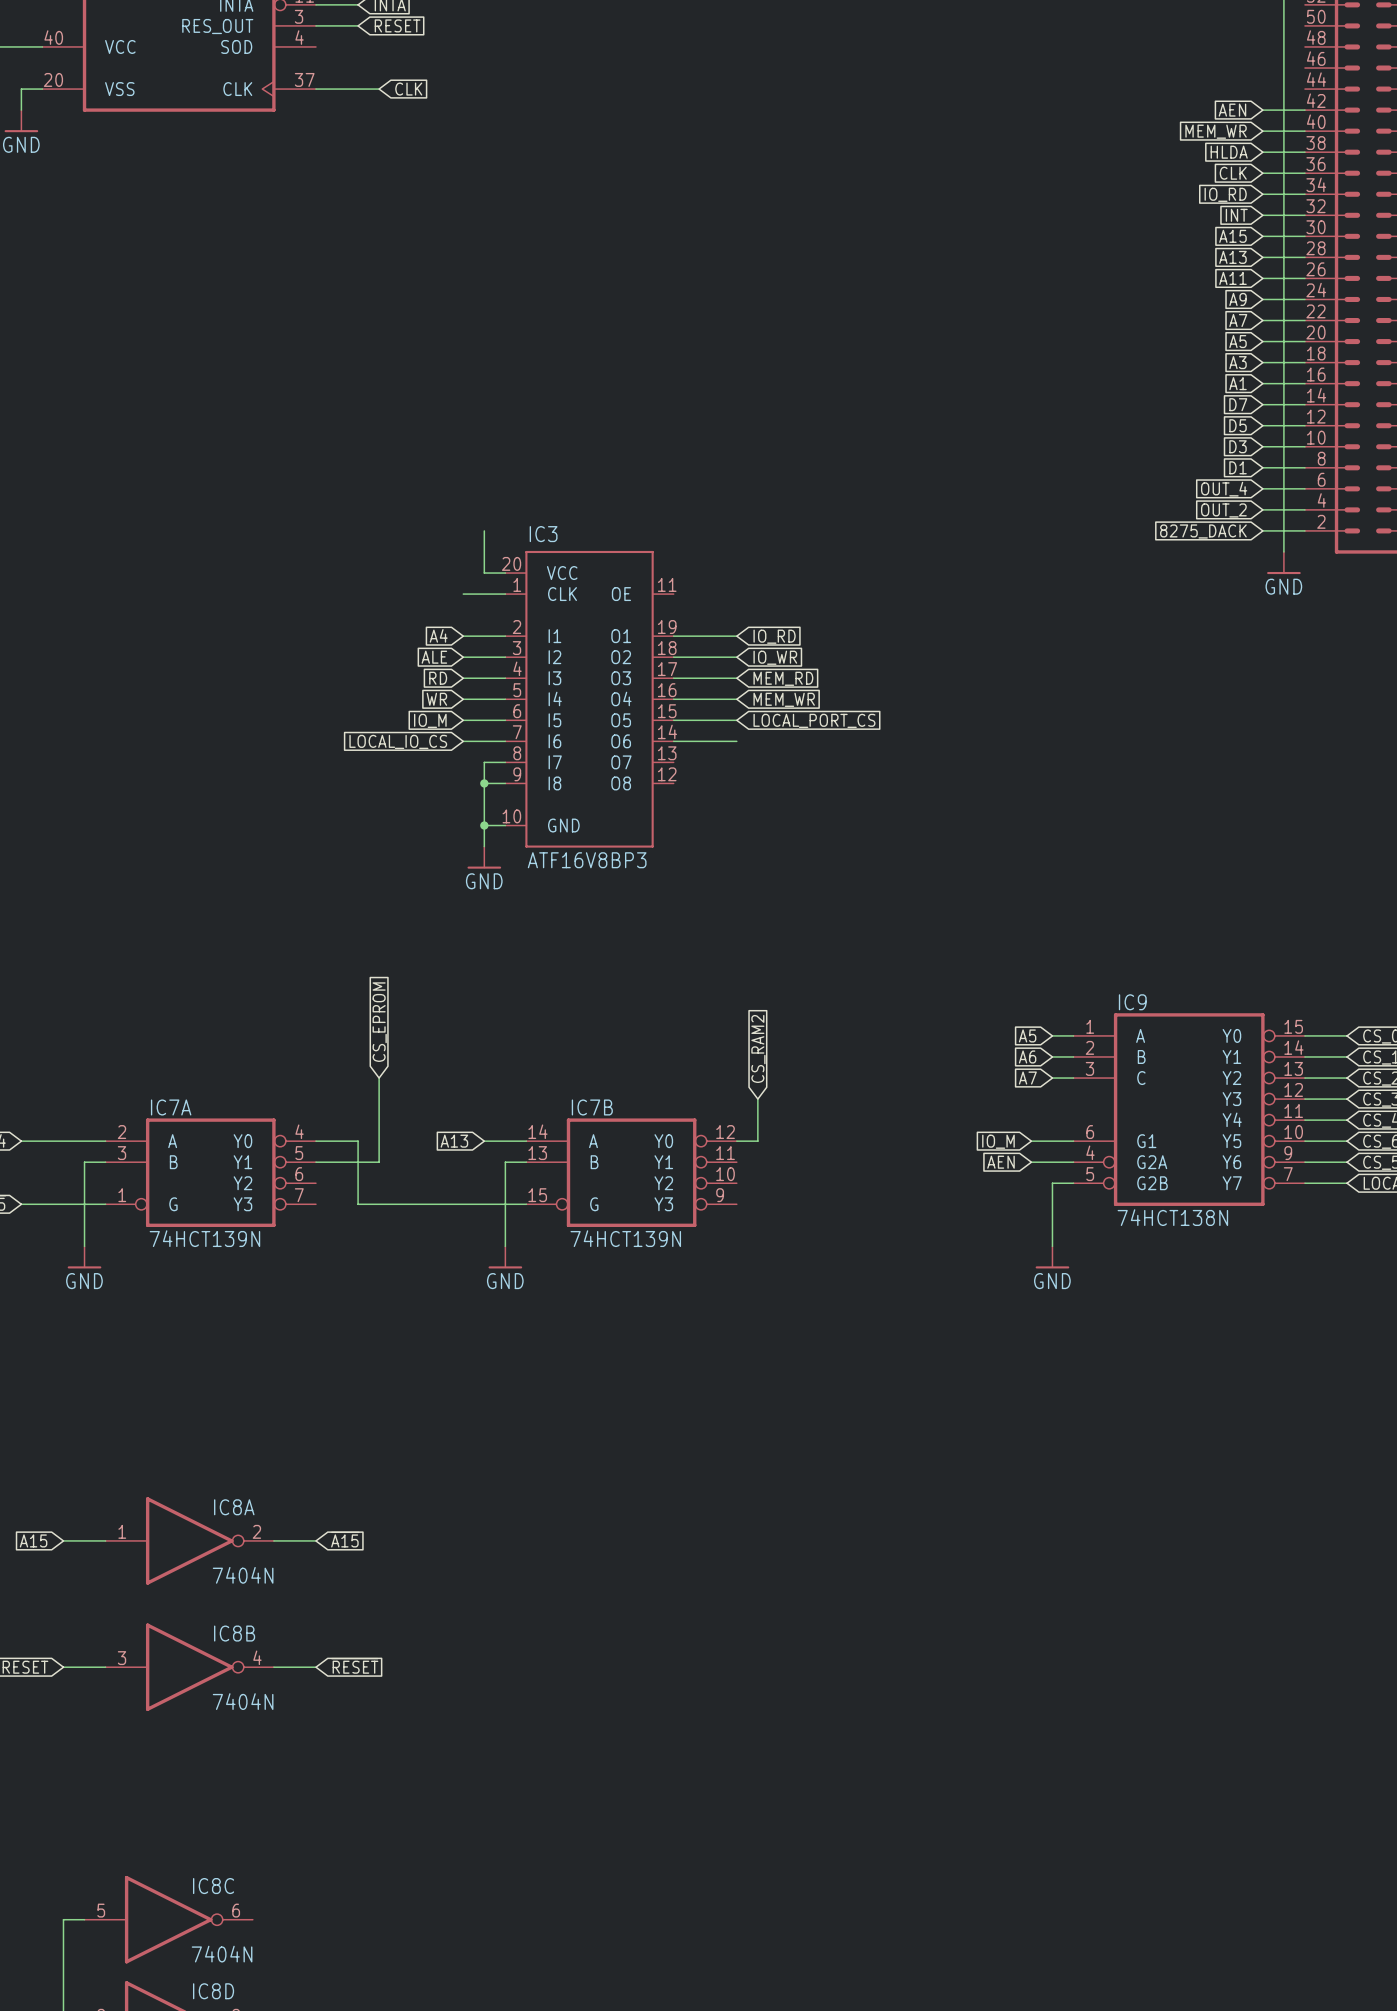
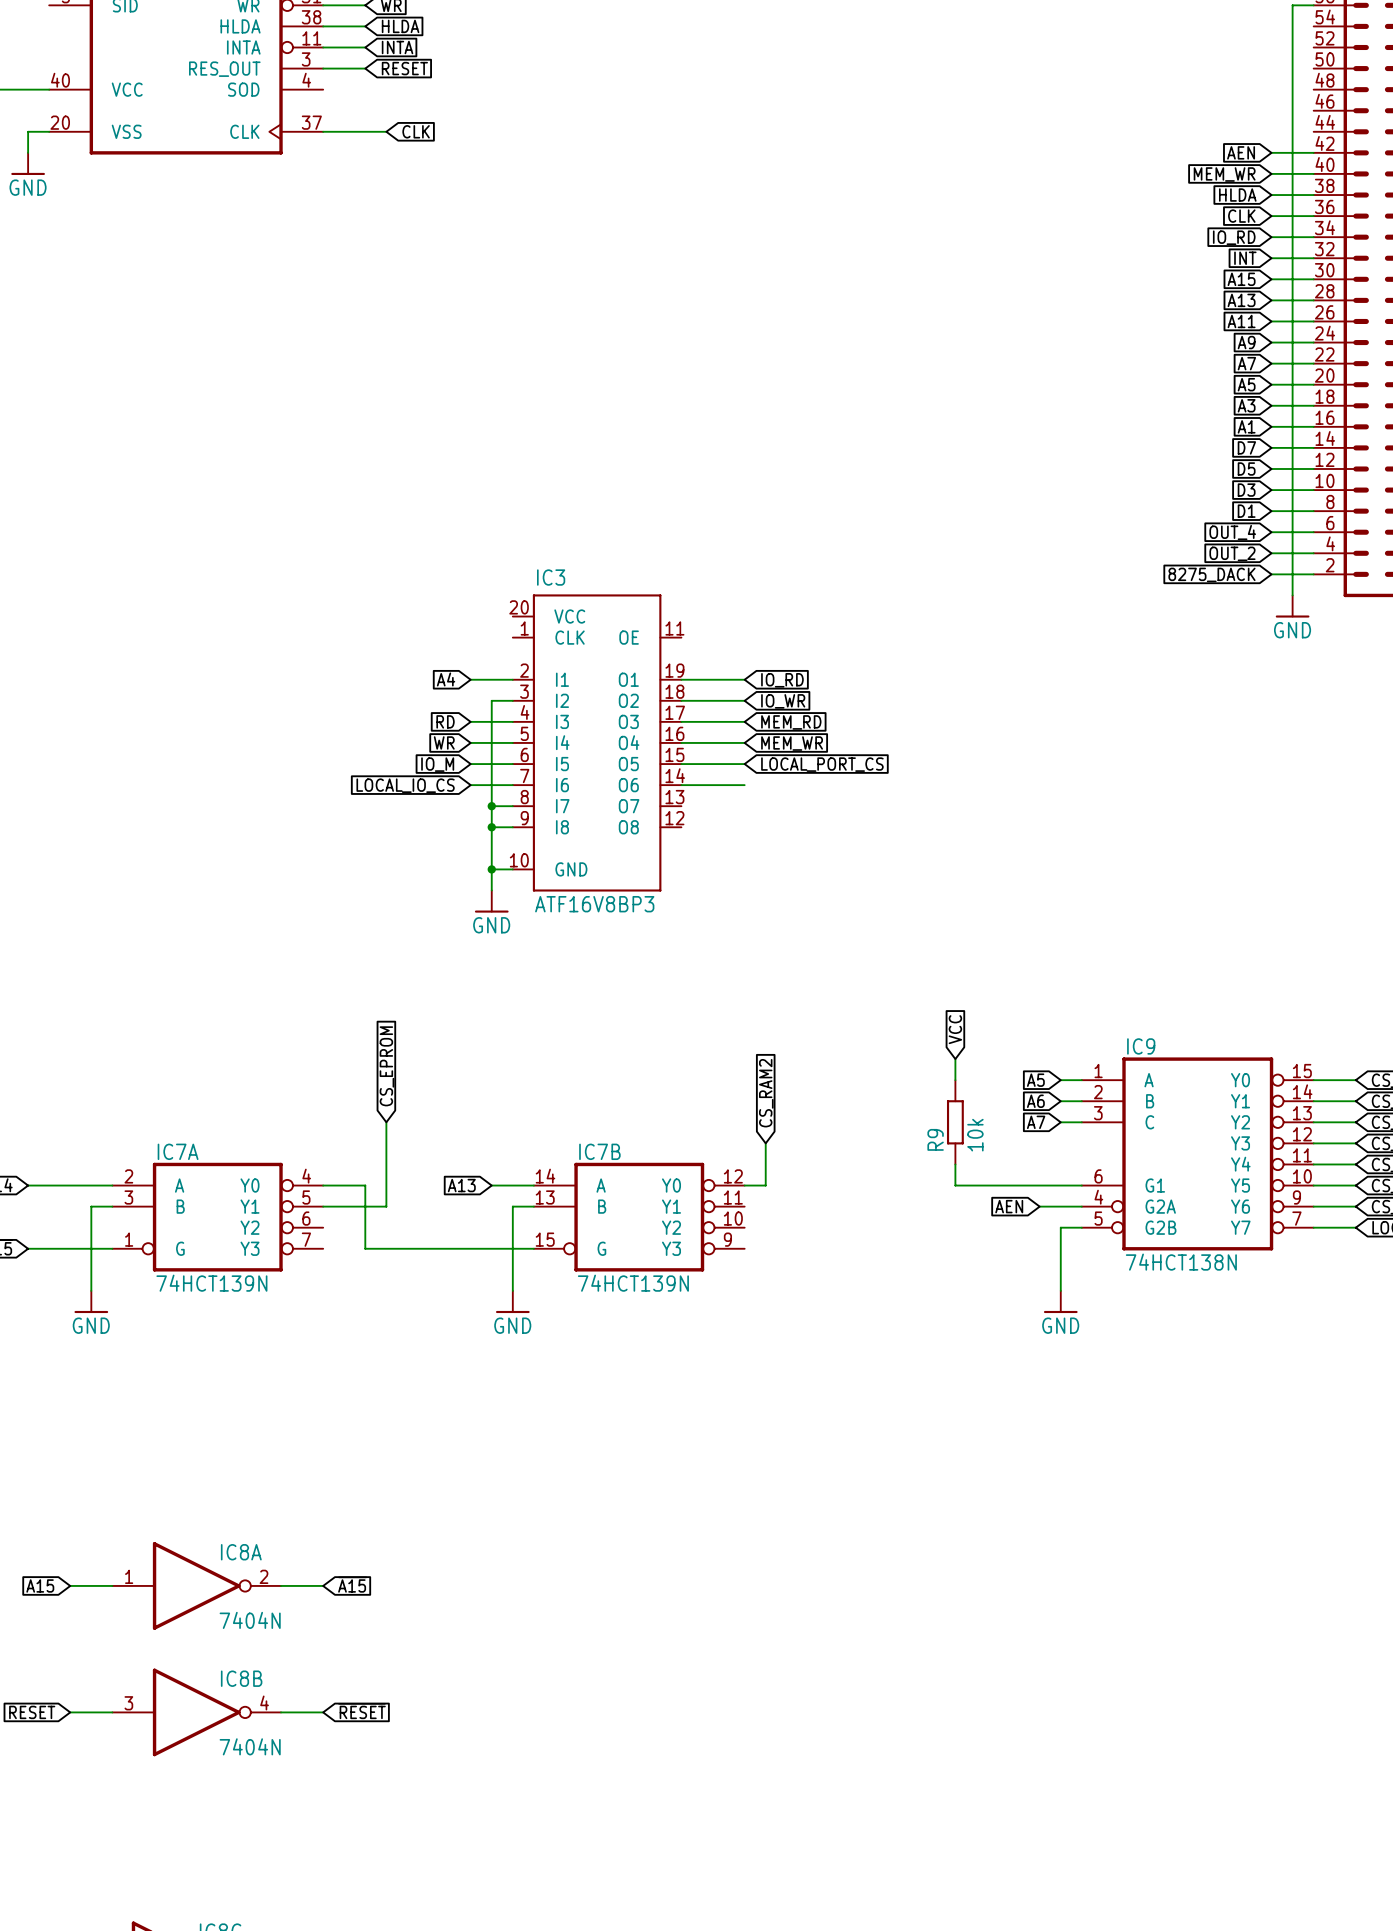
wire: (484, 530) (484, 573) (505, 573) -> none
wire: (463, 594) (505, 594) -> none
global label: ALE (434, 657) -> none
wire: (463, 657) (484, 657) -> (491, 806) (491, 700)
junction: none -> (491, 806)
global label: none -> VCC (955, 1029)
wire: none -> (955, 1059) (955, 1080)
R9: none -> 10k (955, 1122)
wire: none -> (955, 1164) (955, 1185) (1039, 1185)
global label: IO_M (998, 1141) -> none

